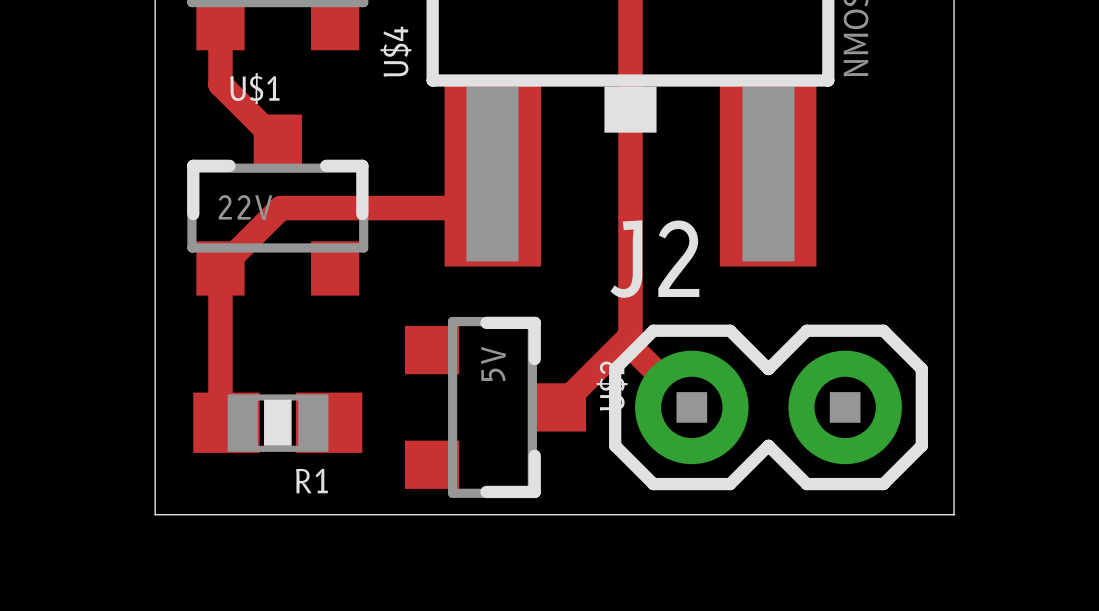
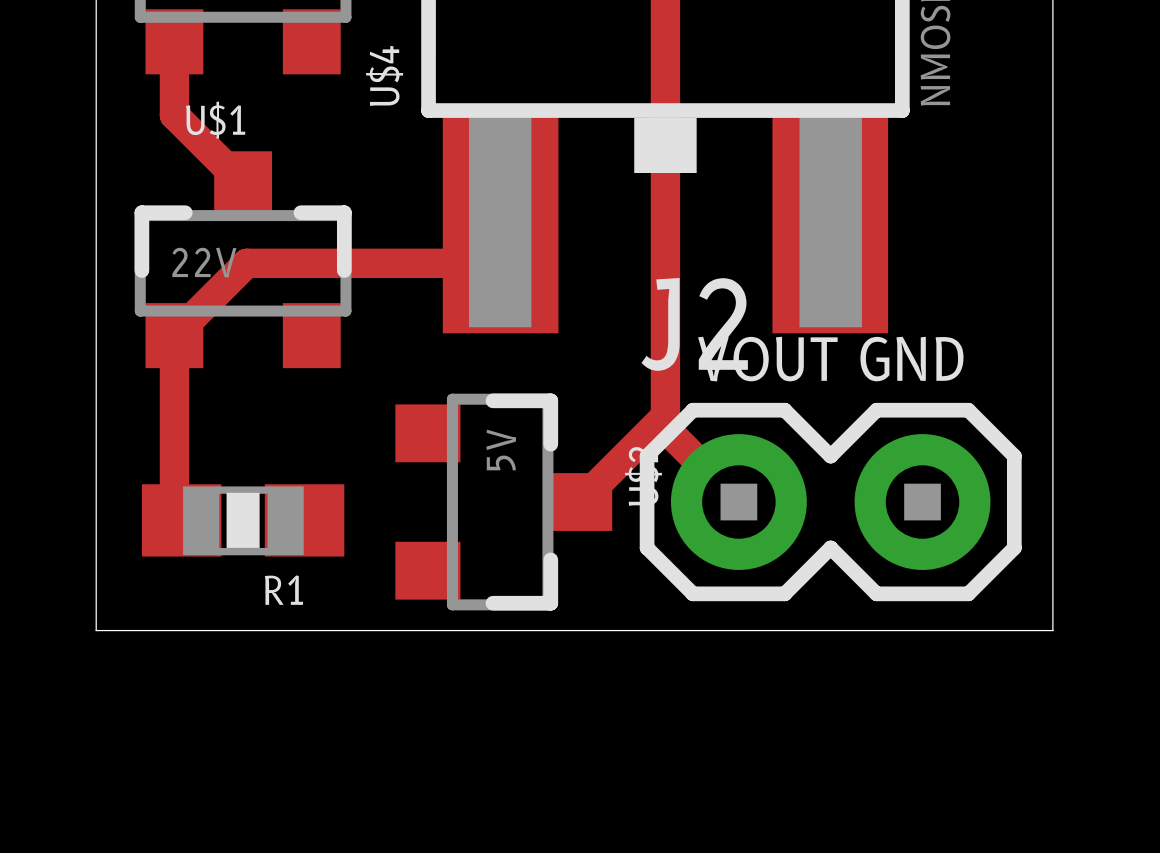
text: none -> VOUT GND (830, 359)

